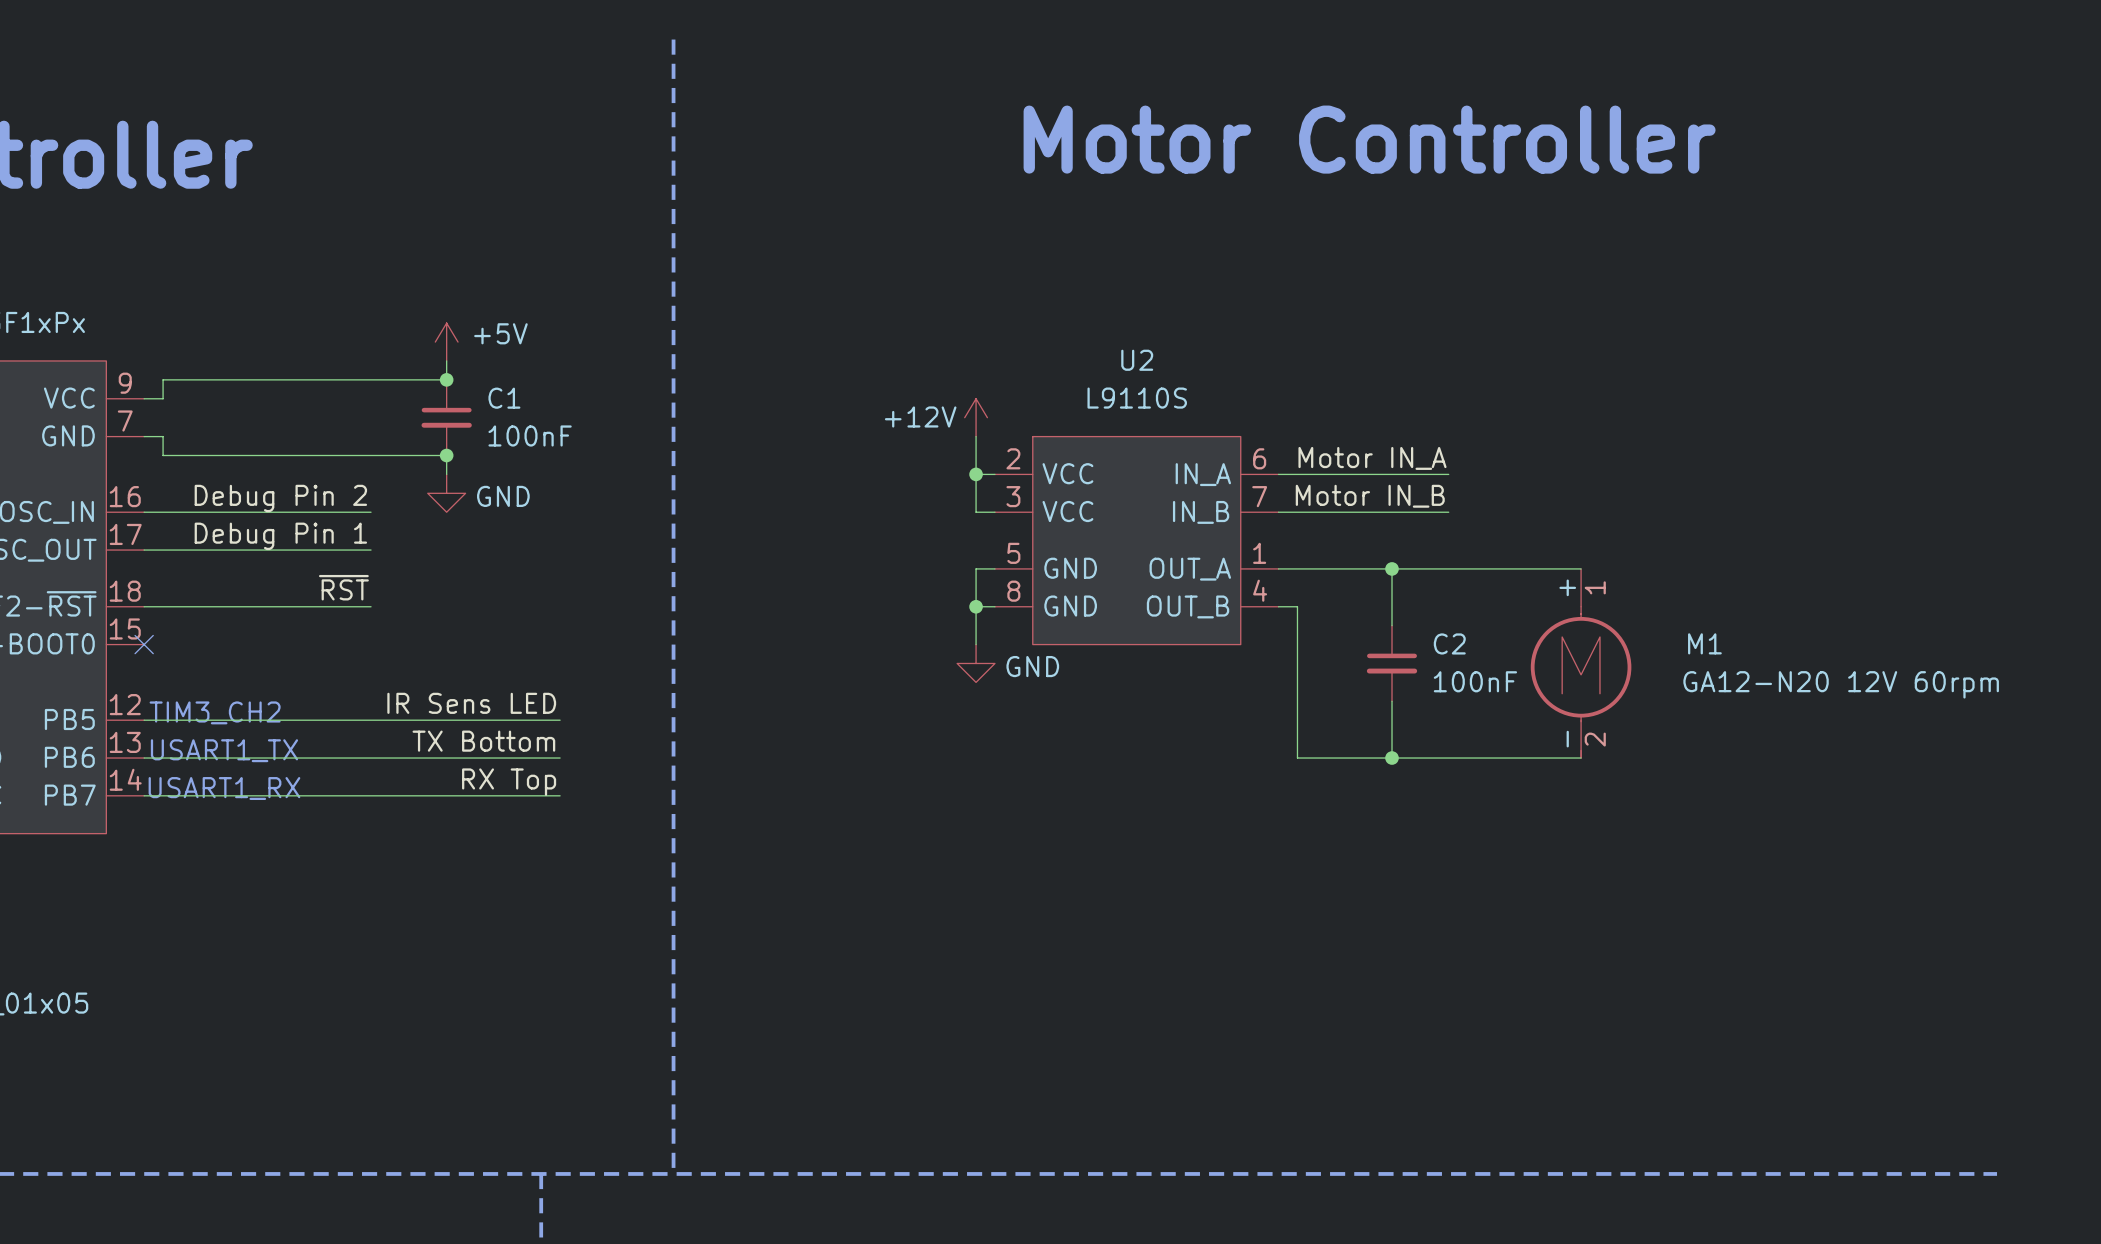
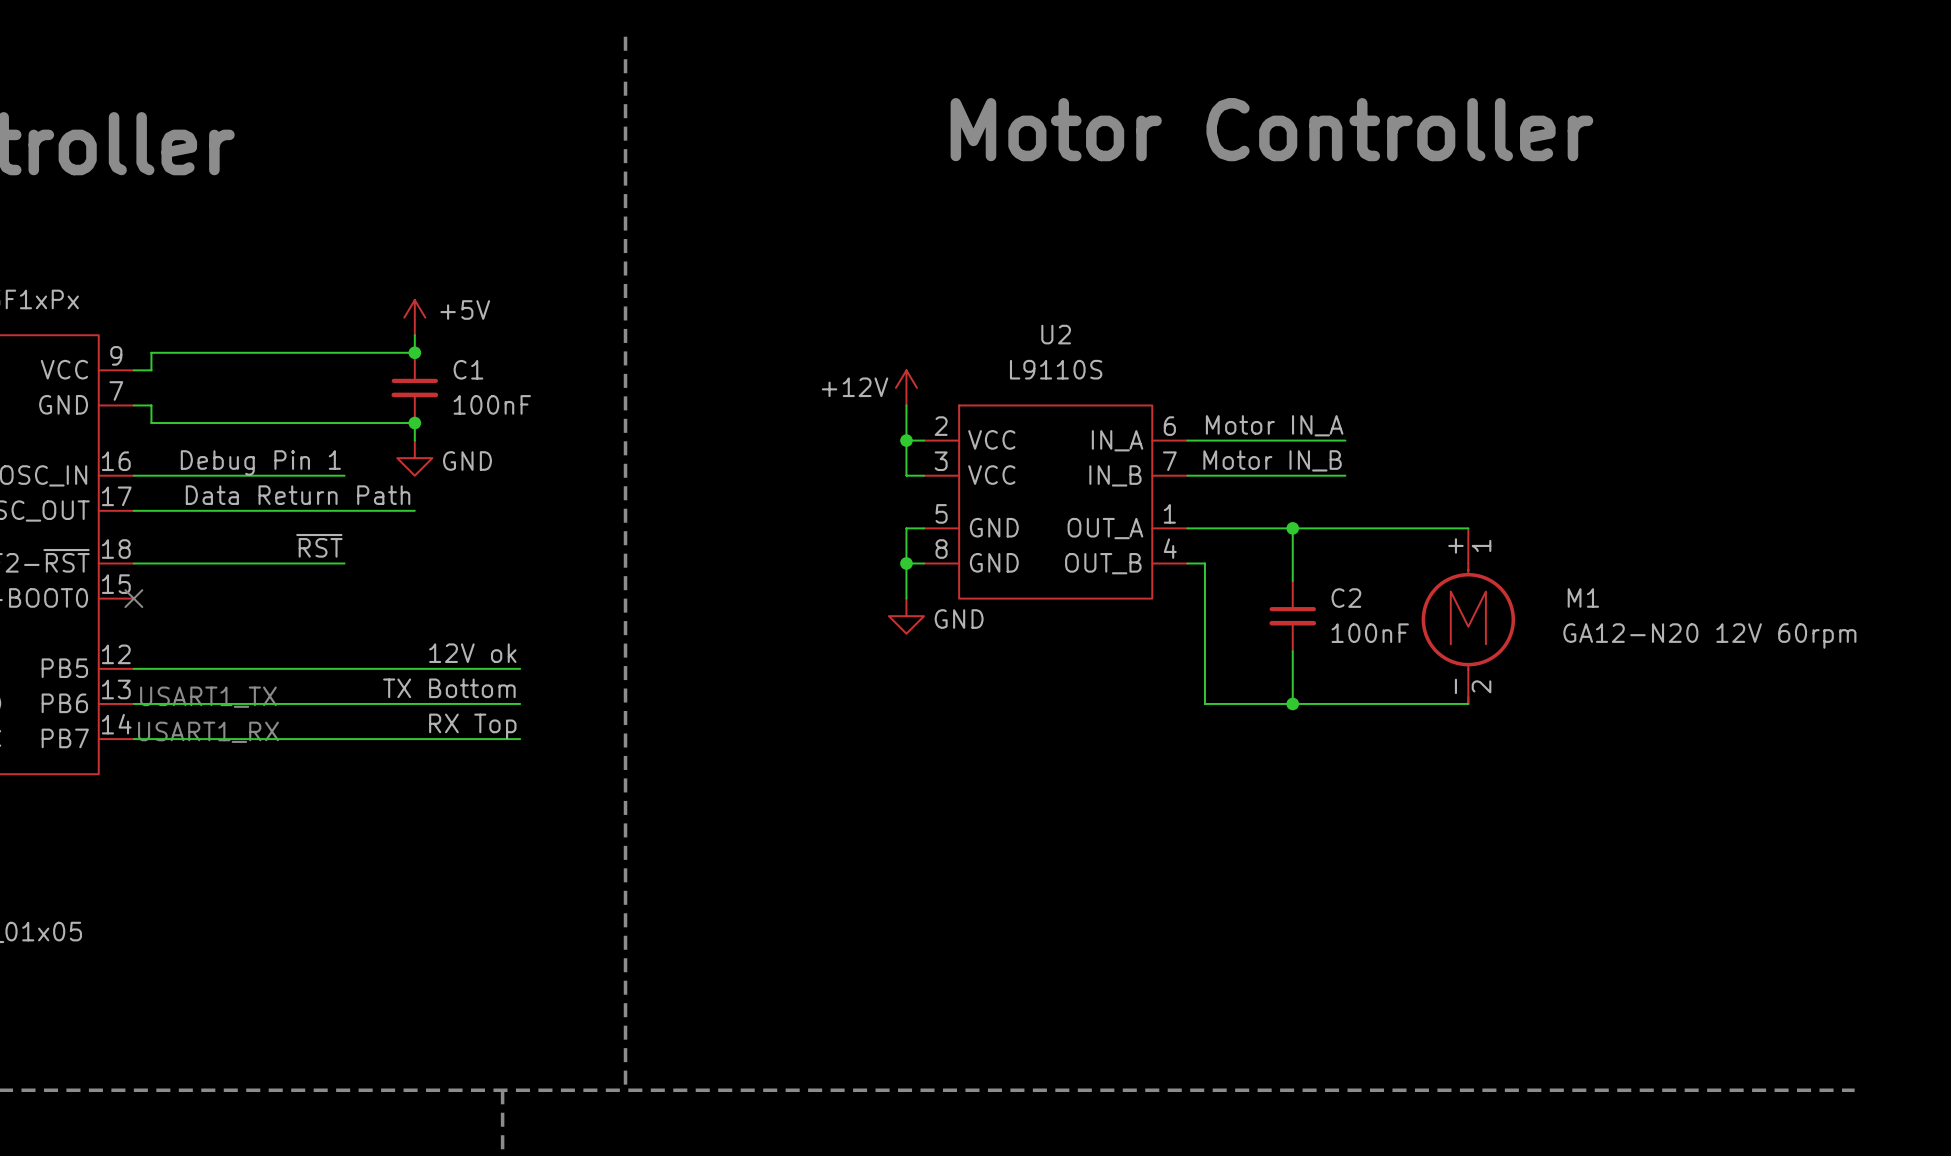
label: Debug Pin 2 (280, 498) -> Debug Pin 1 (260, 462)
label: none -> Data Return Path (298, 495)
label: Debug Pin 1 (280, 536) -> none
wire: none -> (344, 510) (414, 510)
label: IR Sens LED (471, 703) -> 12V ok (472, 653)
text: TIM3_CH2 (215, 712) -> none

